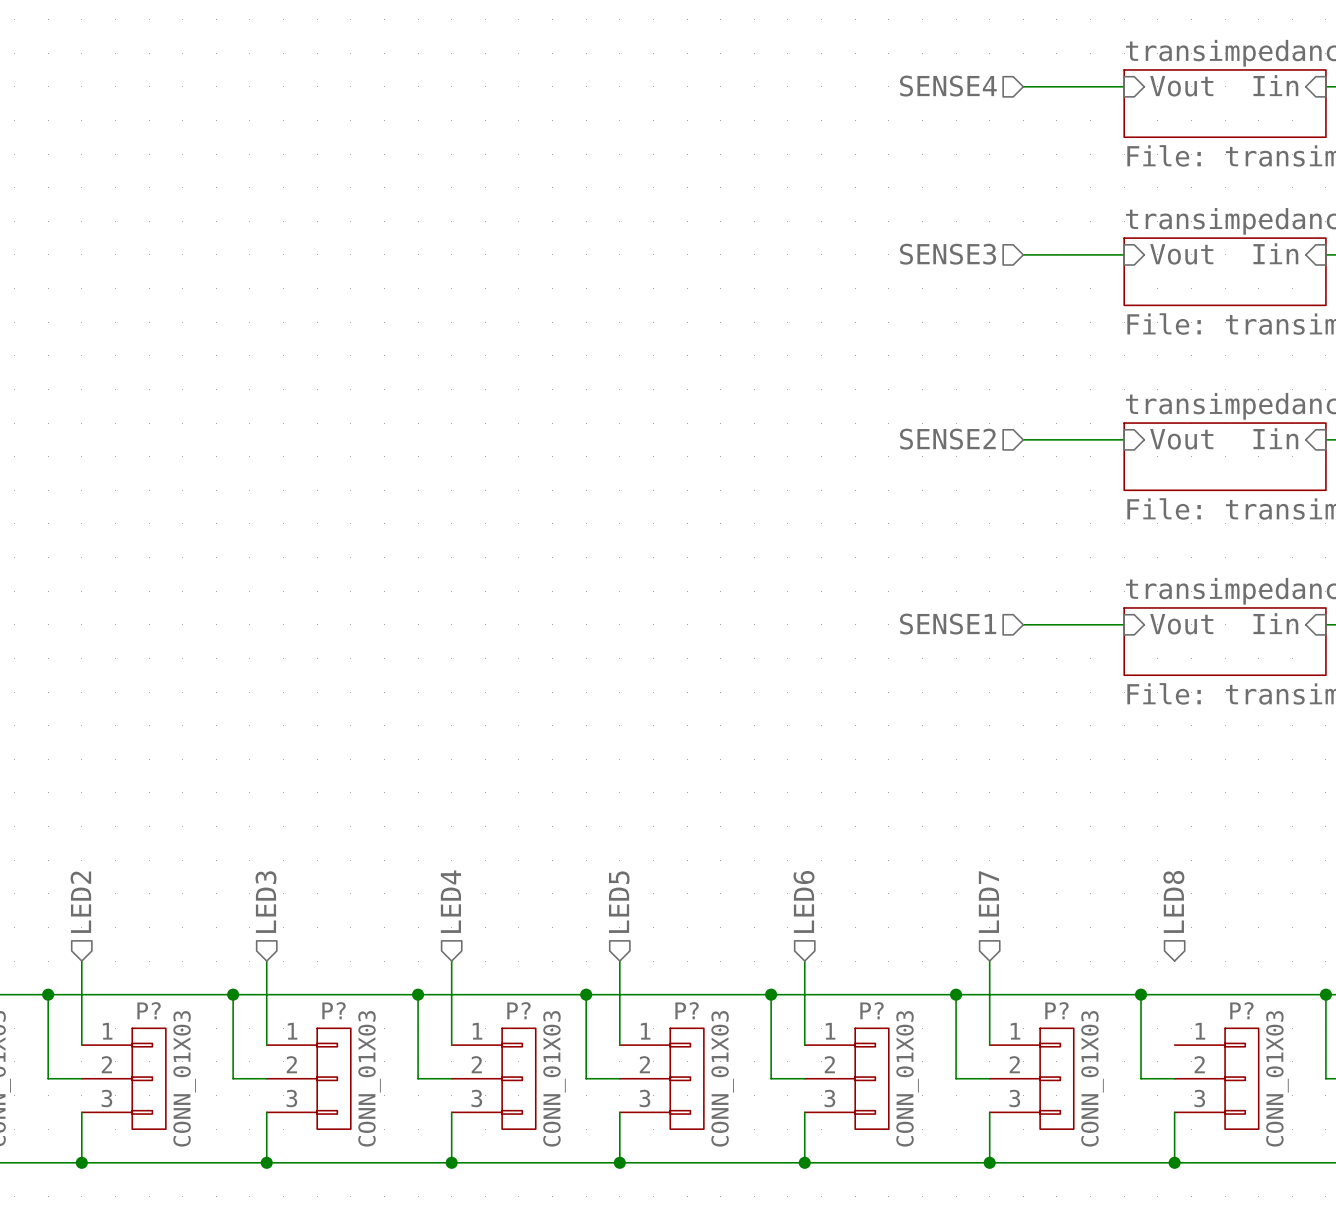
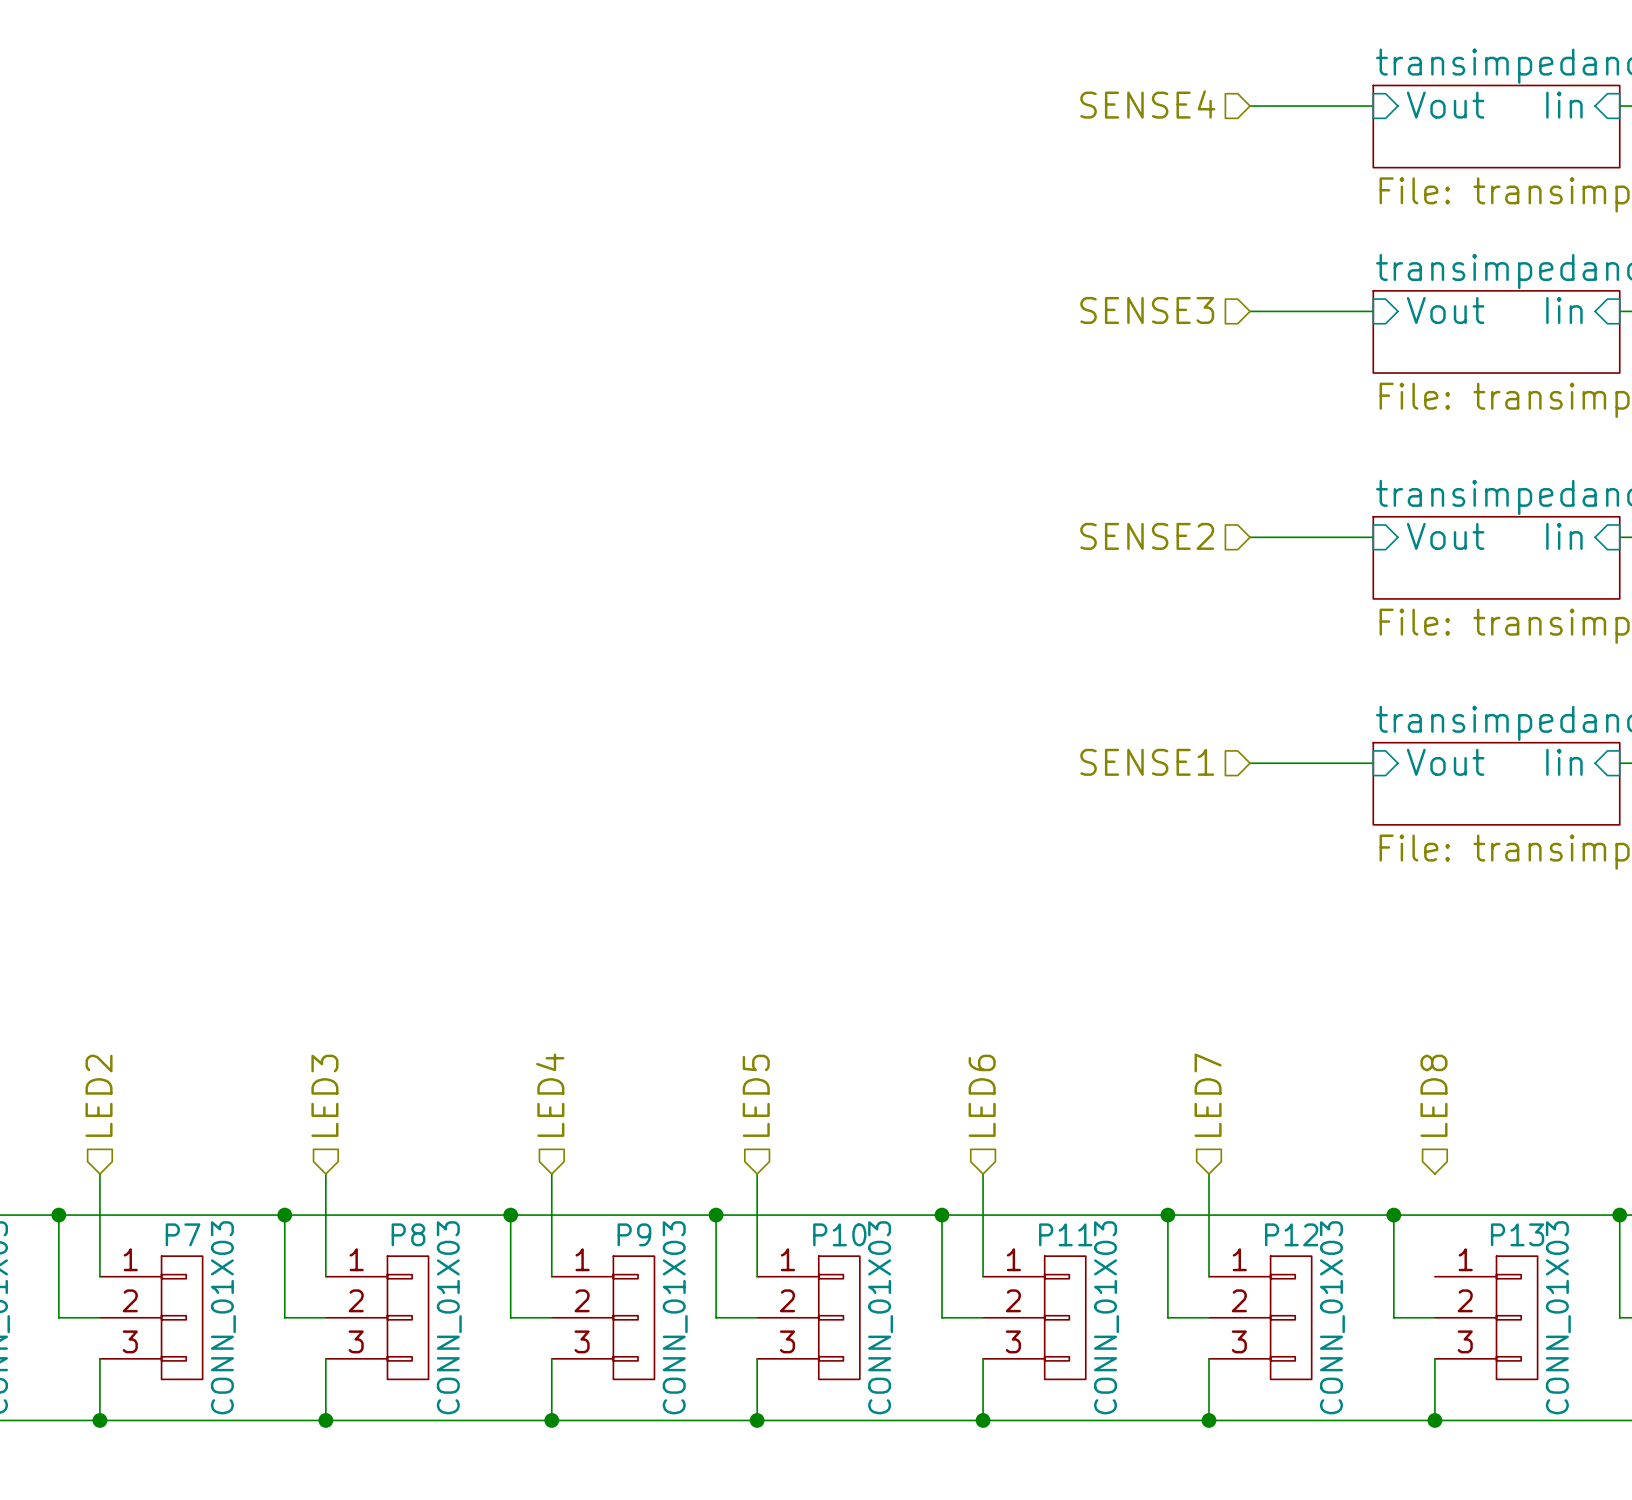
P? name: P? (149, 1010) -> P7 (183, 1234)
P? name: P? (334, 1010) -> P8 (408, 1234)
P? name: P? (518, 1010) -> P9 (634, 1234)
P? name: P? (687, 1010) -> P10 (839, 1234)
P? name: P? (872, 1010) -> P11 (1065, 1234)
P? name: P? (1056, 1010) -> P12 (1291, 1234)
P? name: P? (1241, 1010) -> P13 (1517, 1234)

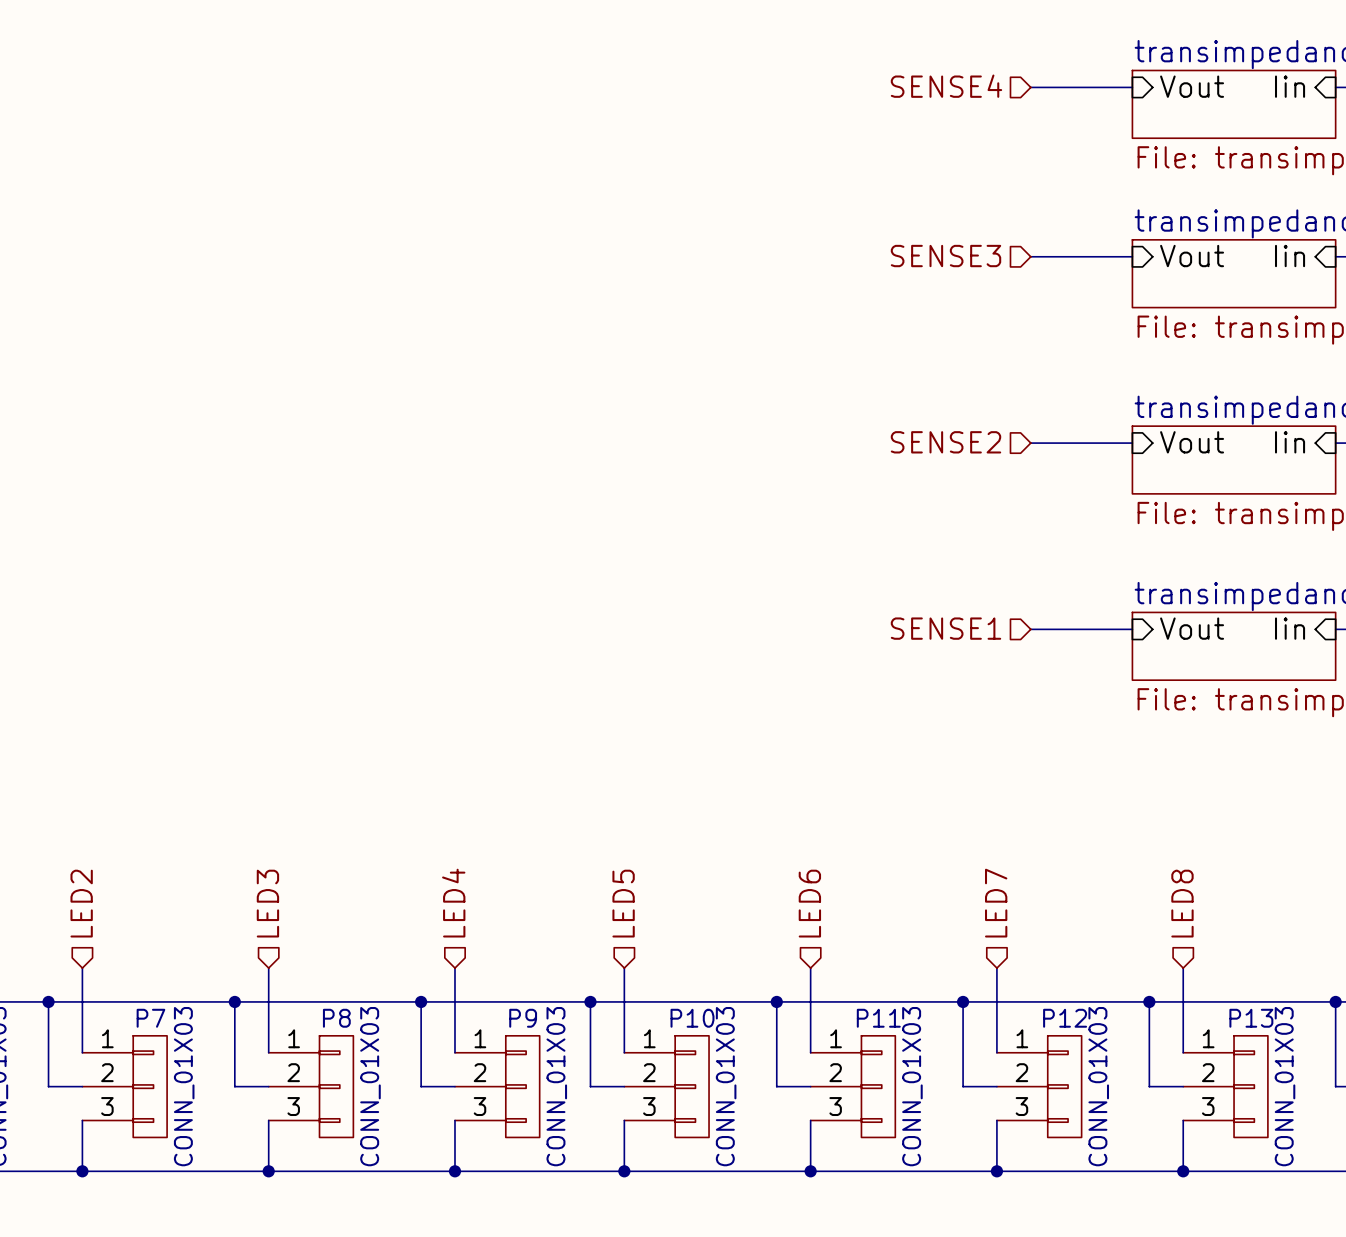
wire: none -> (1183, 968) (1183, 1052)

